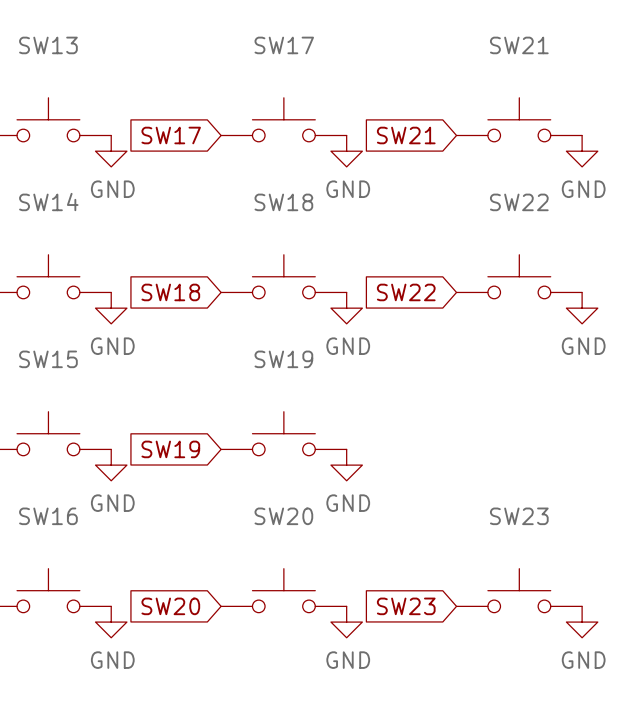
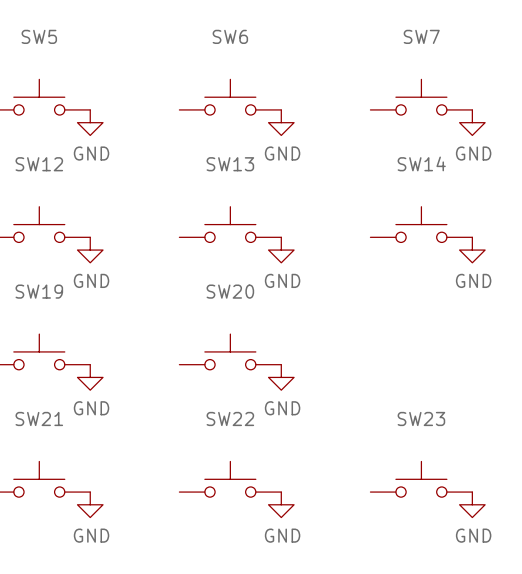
SW13 name: SW13 (48, 45) -> SW5 (39, 36)
SW17 name: SW17 (284, 45) -> SW6 (230, 36)
SW21 name: SW21 (519, 45) -> SW7 (421, 36)
global label: SW17 (171, 135) -> none
global label: SW21 (406, 135) -> none
SW14 name: SW14 (48, 202) -> SW12 (39, 164)
SW18 name: SW18 (283, 202) -> SW13 (230, 164)
SW22 name: SW22 (519, 202) -> SW14 (421, 163)
global label: SW18 (170, 292) -> none
global label: SW22 (406, 292) -> none
SW15 name: SW15 (48, 359) -> SW19 (39, 291)
SW19 name: SW19 (283, 359) -> SW20 (230, 291)
global label: SW19 (170, 449) -> none
SW16 name: SW16 (48, 516) -> SW21 (39, 418)
SW20 name: SW20 (283, 516) -> SW22 (230, 418)
global label: SW20 (170, 606) -> none
global label: SW23 (406, 606) -> none

